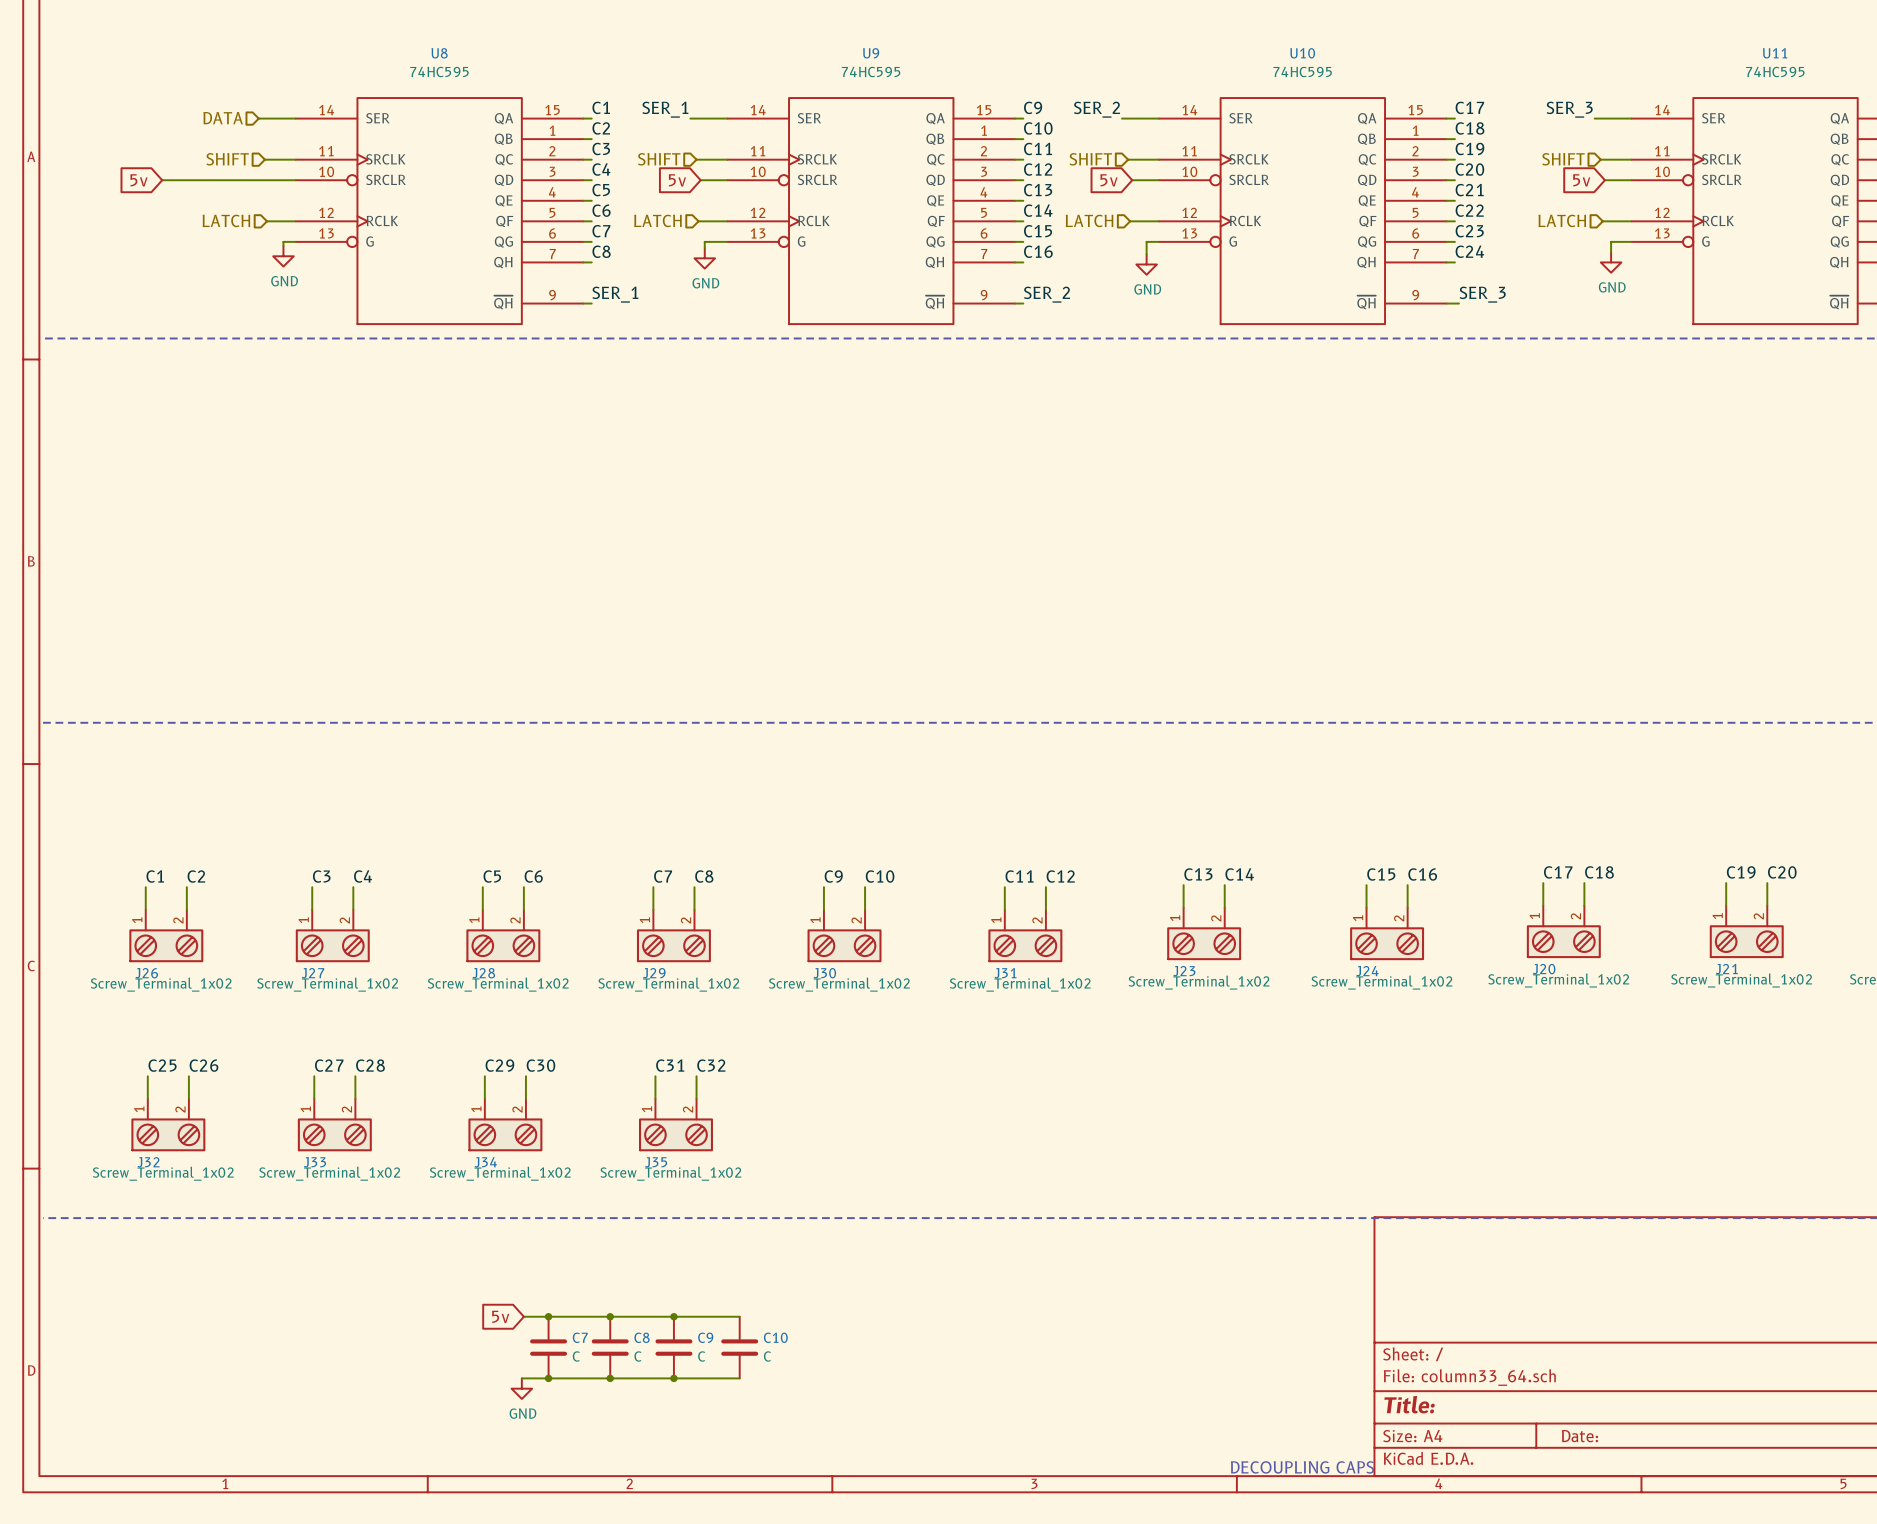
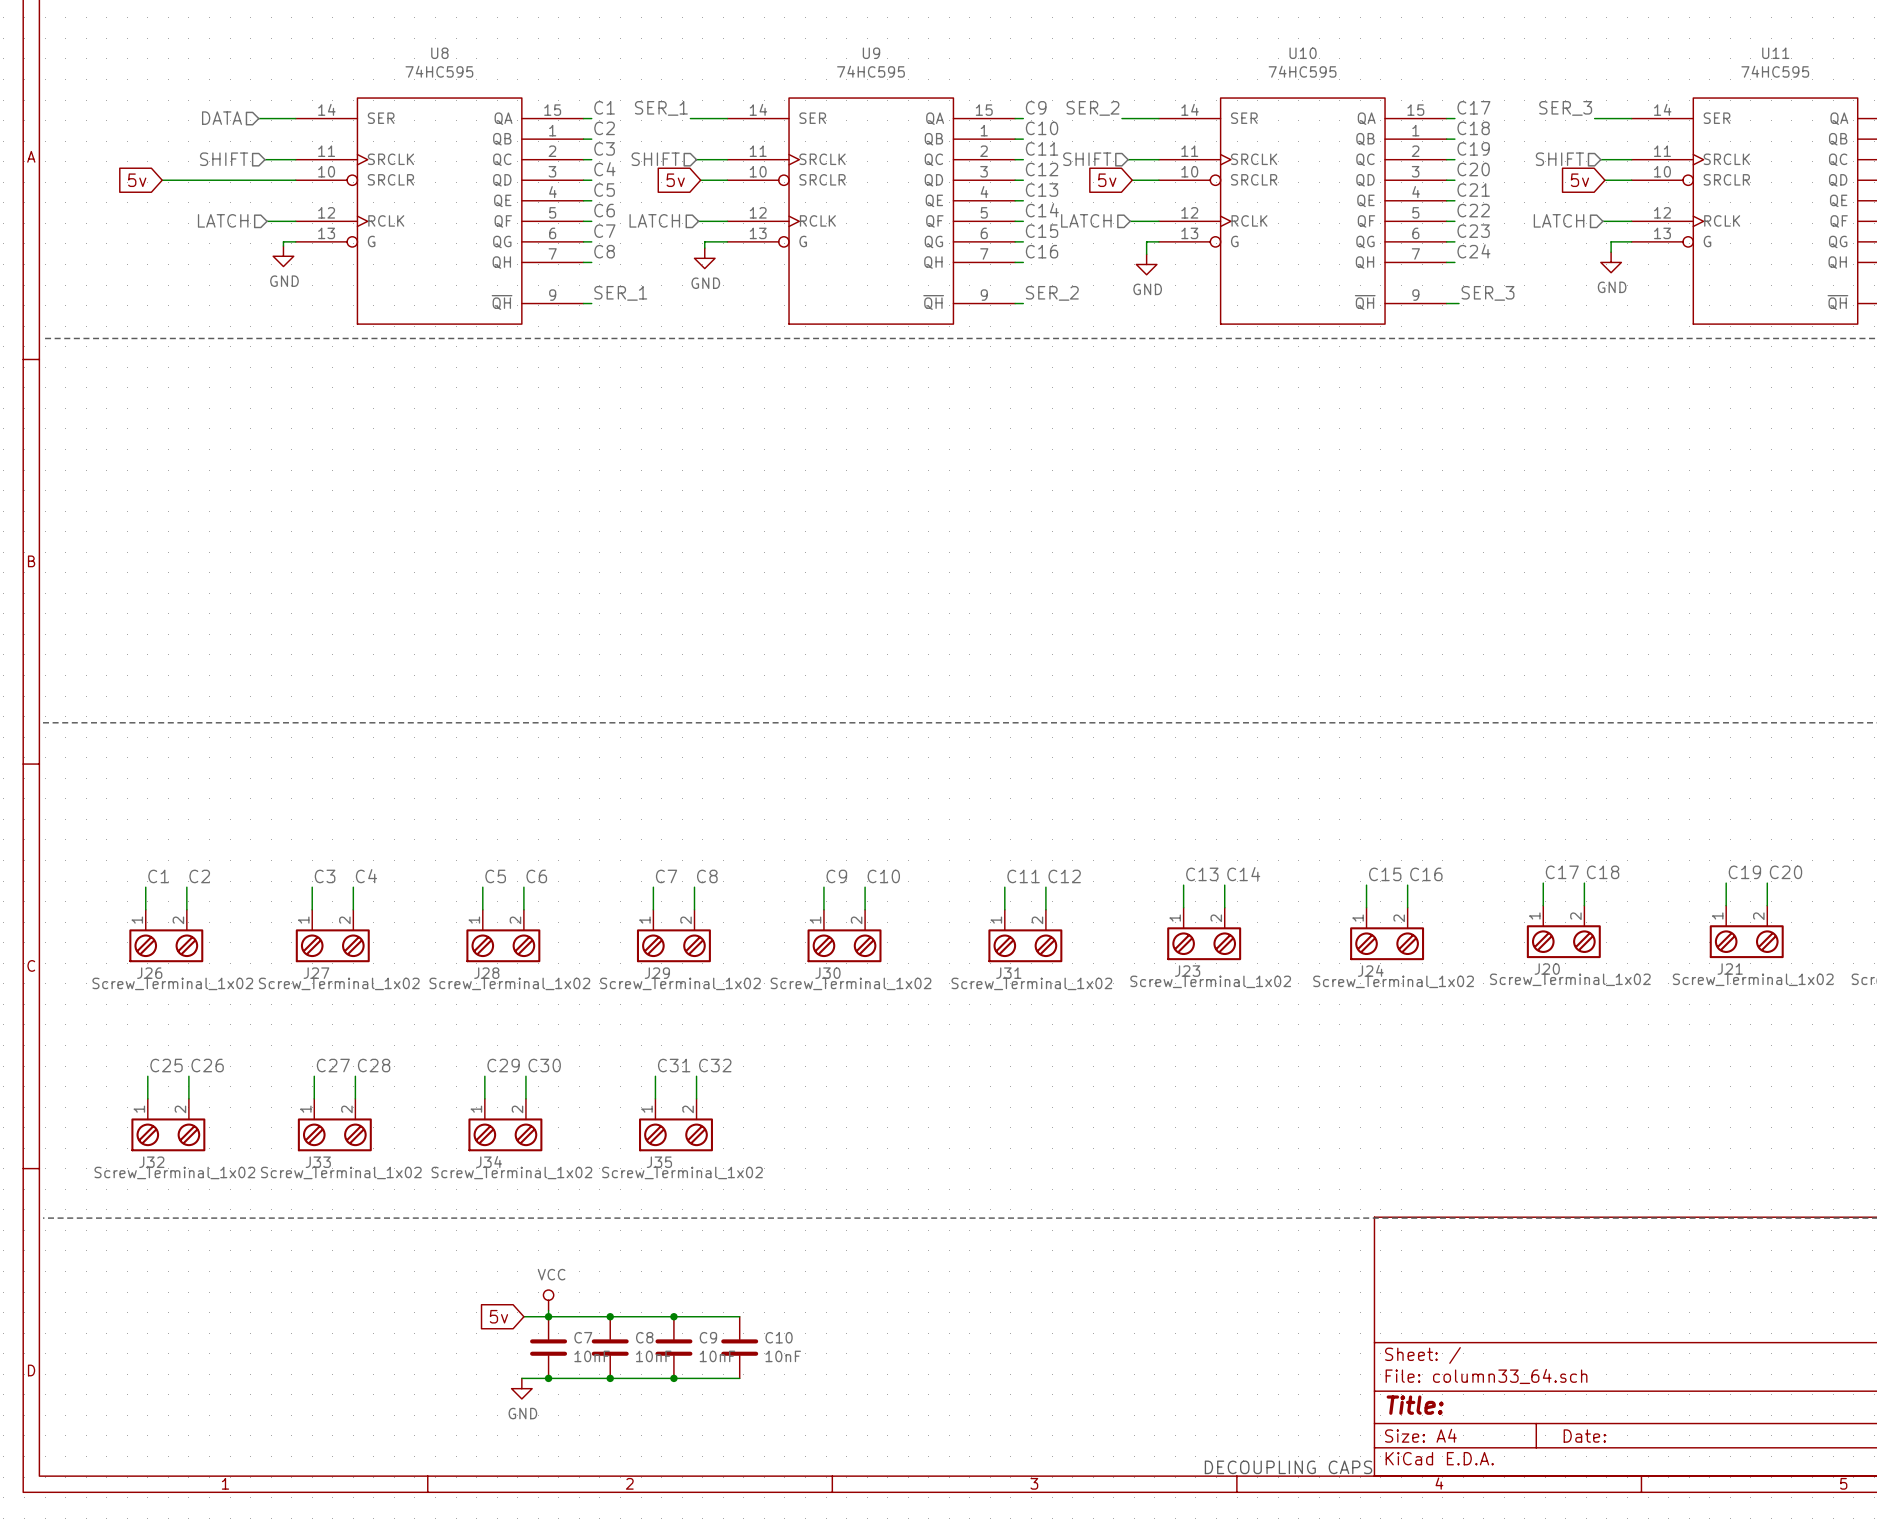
power symbol: none -> VCC (548, 1300)
C7 value: C (576, 1356) -> 10nF (592, 1356)
C8 value: C (637, 1356) -> 10nF (653, 1356)
C9 value: C (701, 1356) -> 10nF (717, 1356)
C10 value: C (767, 1356) -> 10nF (783, 1356)

